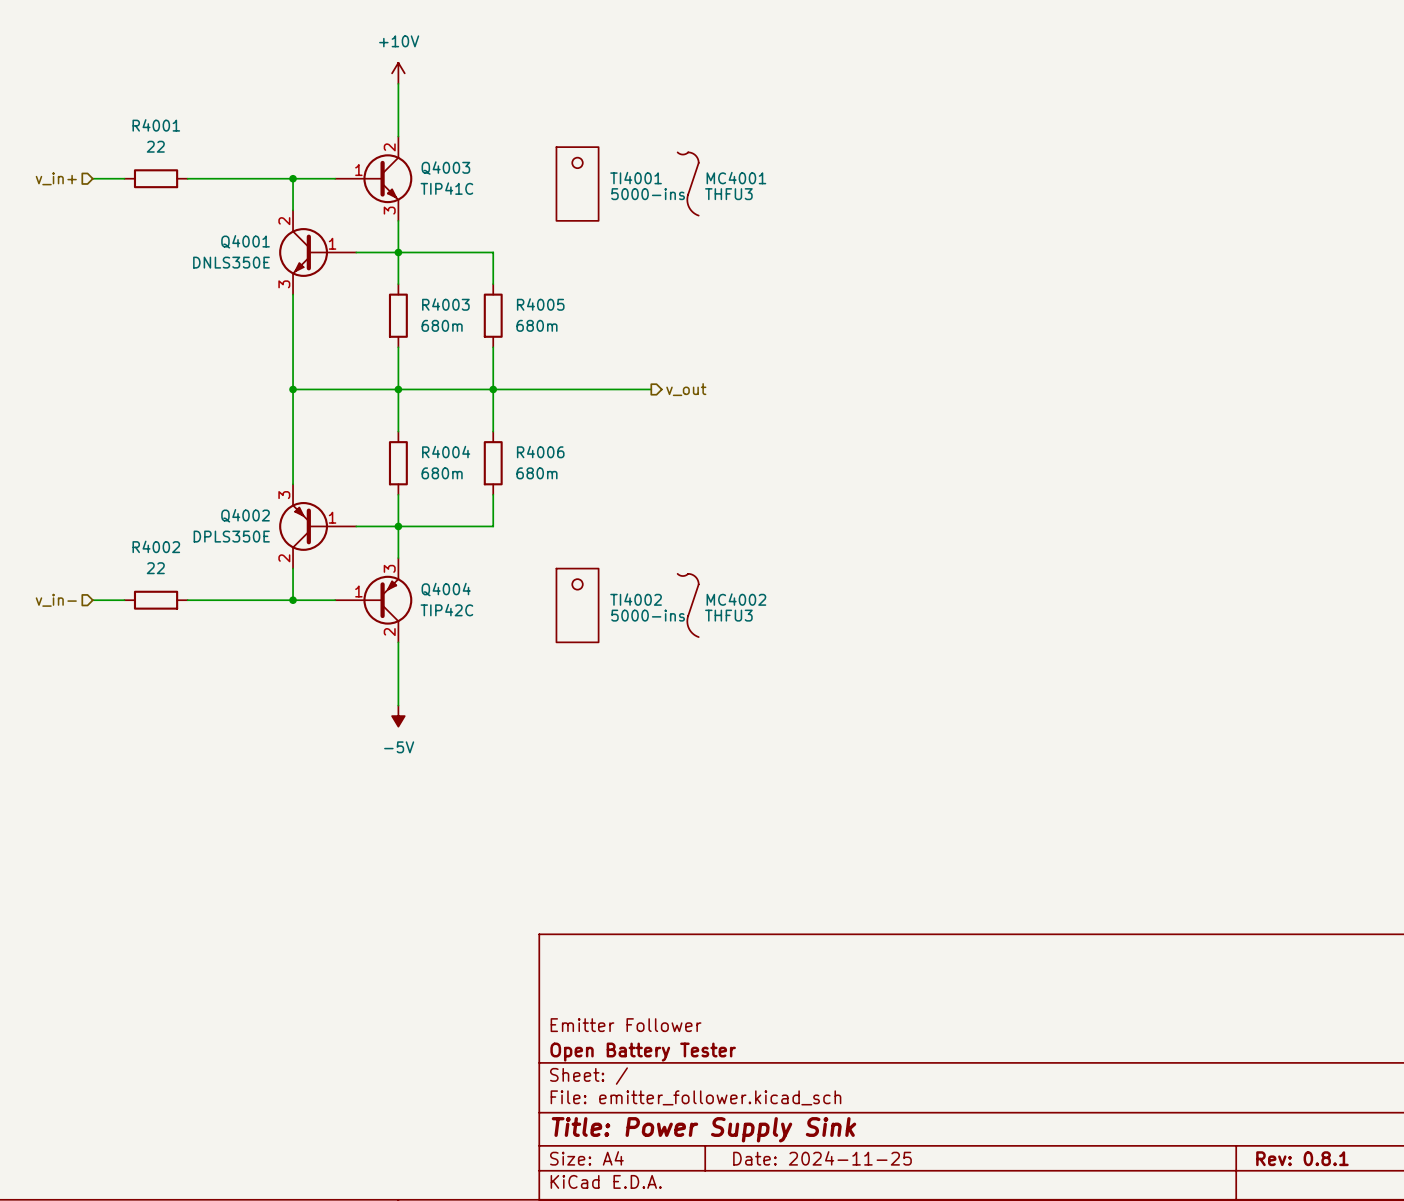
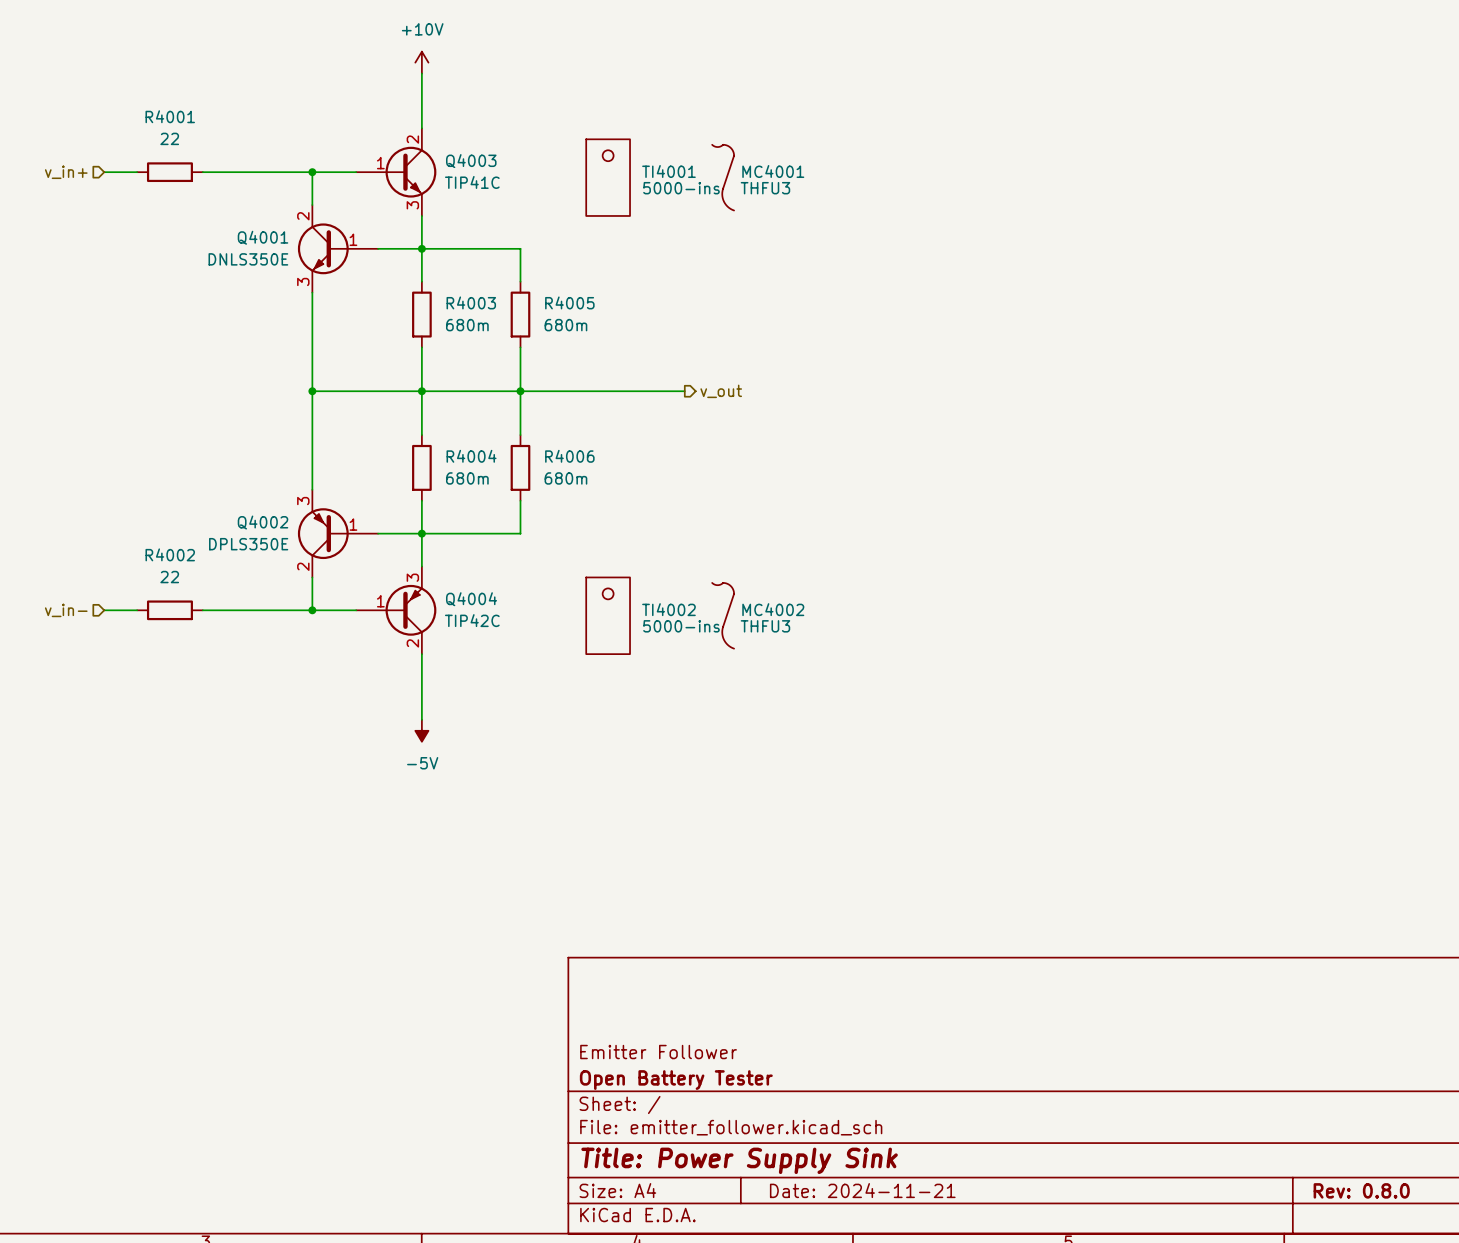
title block: Date: 2024-11-25 (822, 1158) -> Date: 2024-11-21 (862, 1190)
title block: Rev: 0.8.1 (1302, 1158) -> Rev: 0.8.0 (1361, 1190)

